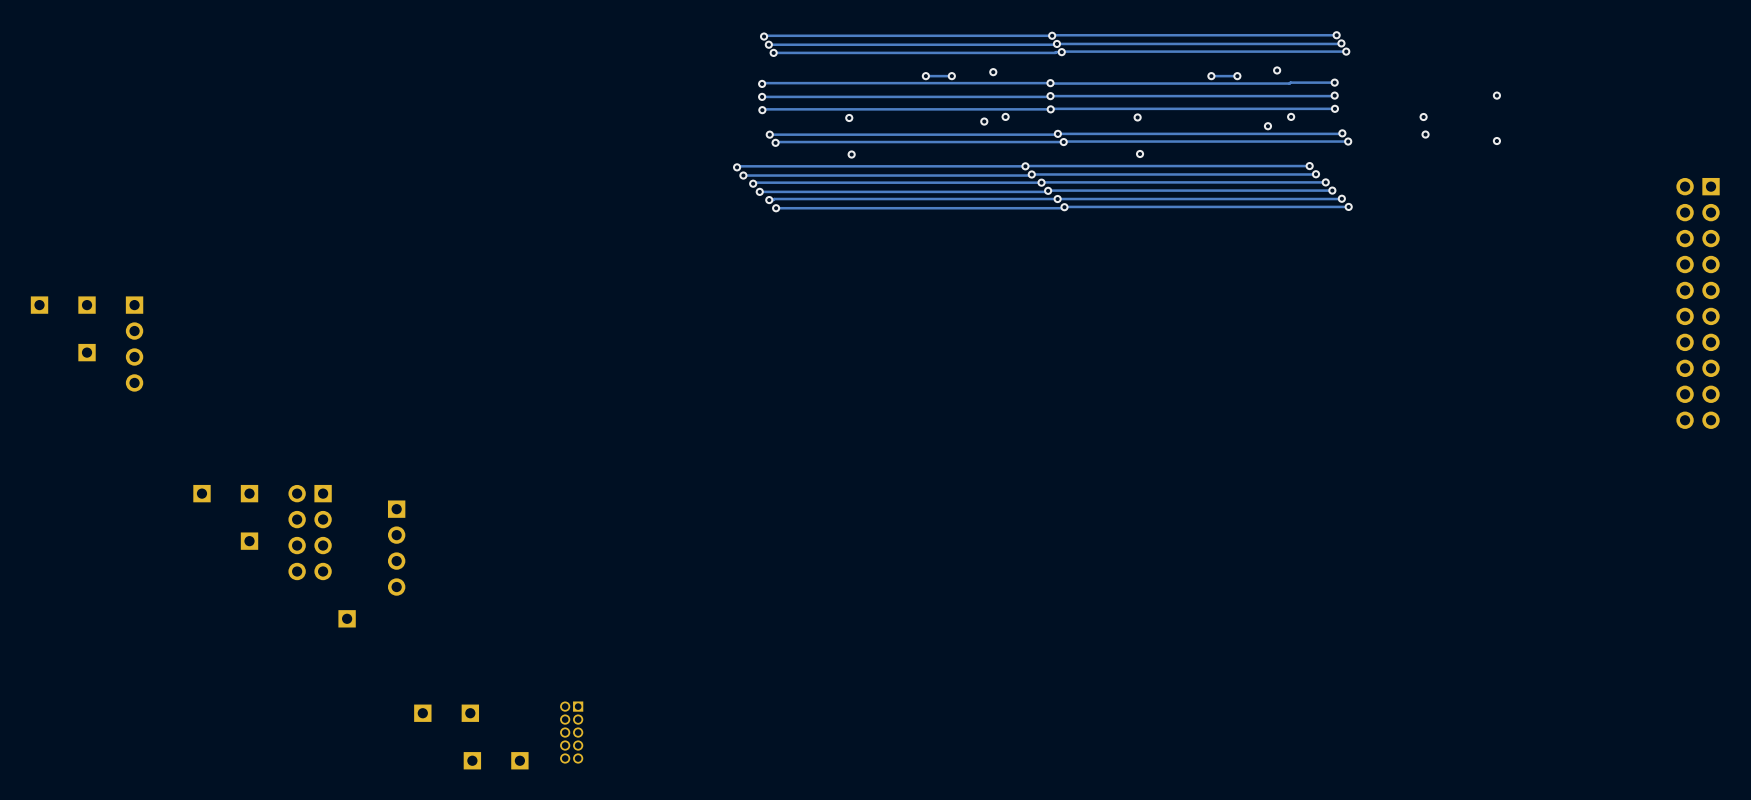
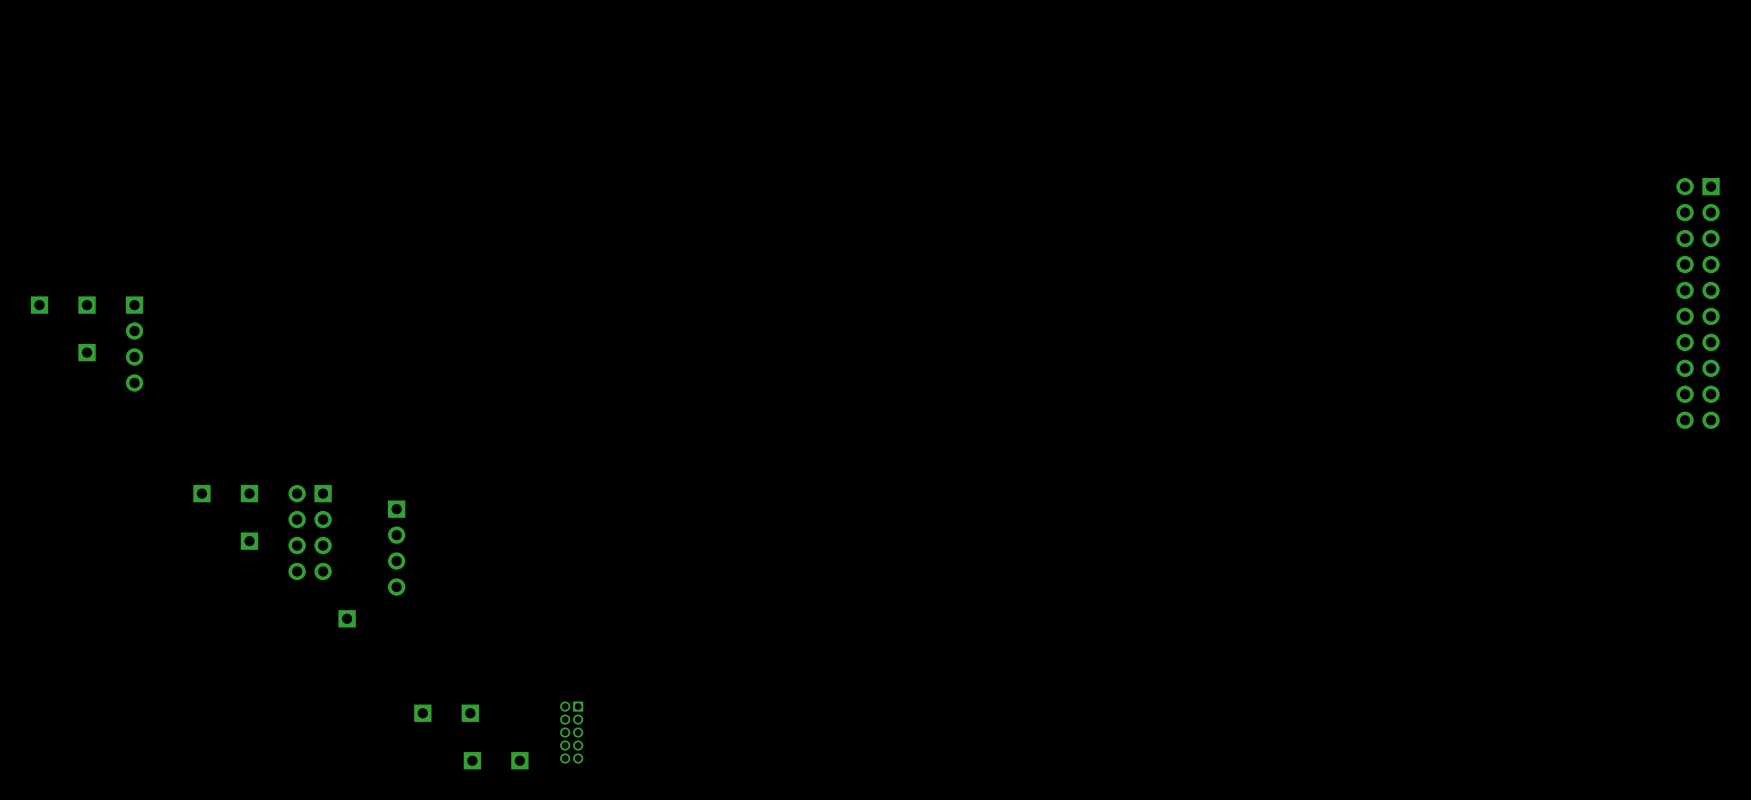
via: (1052, 35) -> none
track: (1336, 35) (764, 36) -> none
via: (1336, 35) -> none
via: (764, 36) -> none
via: (1056, 43) -> none
track: (1341, 43) (768, 44) -> none
via: (1341, 43) -> none
via: (768, 44) -> none
track: (1346, 51) (773, 52) -> none
via: (1346, 51) -> none
via: (773, 52) -> none
via: (1061, 52) -> none
via: (1277, 70) -> none
via: (993, 72) -> none
via: (925, 76) -> none
track: (951, 76) (925, 76) -> none
via: (951, 76) -> none
via: (1211, 76) -> none
track: (1237, 76) (1211, 76) -> none
via: (1237, 76) -> none
track: (1334, 82) (762, 83) -> none
via: (1334, 82) -> none
via: (762, 83) -> none
via: (1050, 83) -> none
track: (1334, 95) (762, 96) -> none
via: (1334, 95) -> none
via: (1496, 95) -> none
via: (762, 96) -> none
via: (1050, 96) -> none
track: (1334, 108) (762, 110) -> none
via: (1334, 108) -> none
via: (1050, 109) -> none
via: (762, 110) -> none
via: (1005, 116) -> none
via: (1291, 116) -> none
via: (849, 117) -> none
via: (1137, 117) -> none
via: (1423, 117) -> none
via: (984, 121) -> none
via: (1267, 126) -> none
via: (1057, 133) -> none
track: (1342, 133) (769, 134) -> none
via: (1342, 133) -> none
via: (769, 134) -> none
via: (1425, 134) -> none
track: (1348, 141) (775, 142) -> none
via: (1348, 141) -> none
via: (1496, 141) -> none
via: (775, 142) -> none
via: (1063, 142) -> none
via: (851, 154) -> none
via: (1140, 154) -> none
via: (1025, 166) -> none
track: (1309, 166) (737, 167) -> none
via: (1309, 166) -> none
via: (737, 167) -> none
via: (1031, 174) -> none
track: (1316, 174) (743, 175) -> none
via: (1316, 174) -> none
via: (743, 175) -> none
via: (1041, 182) -> none
track: (1325, 182) (753, 183) -> none
via: (1325, 182) -> none
via: (753, 183) -> none
via: (1048, 190) -> none
track: (1332, 190) (759, 191) -> none
via: (1332, 190) -> none
via: (759, 191) -> none
track: (1341, 198) (769, 200) -> none
via: (1341, 198) -> none
via: (1057, 199) -> none
via: (769, 200) -> none
track: (1348, 206) (776, 208) -> none
via: (1348, 206) -> none
via: (1064, 207) -> none
via: (776, 208) -> none

